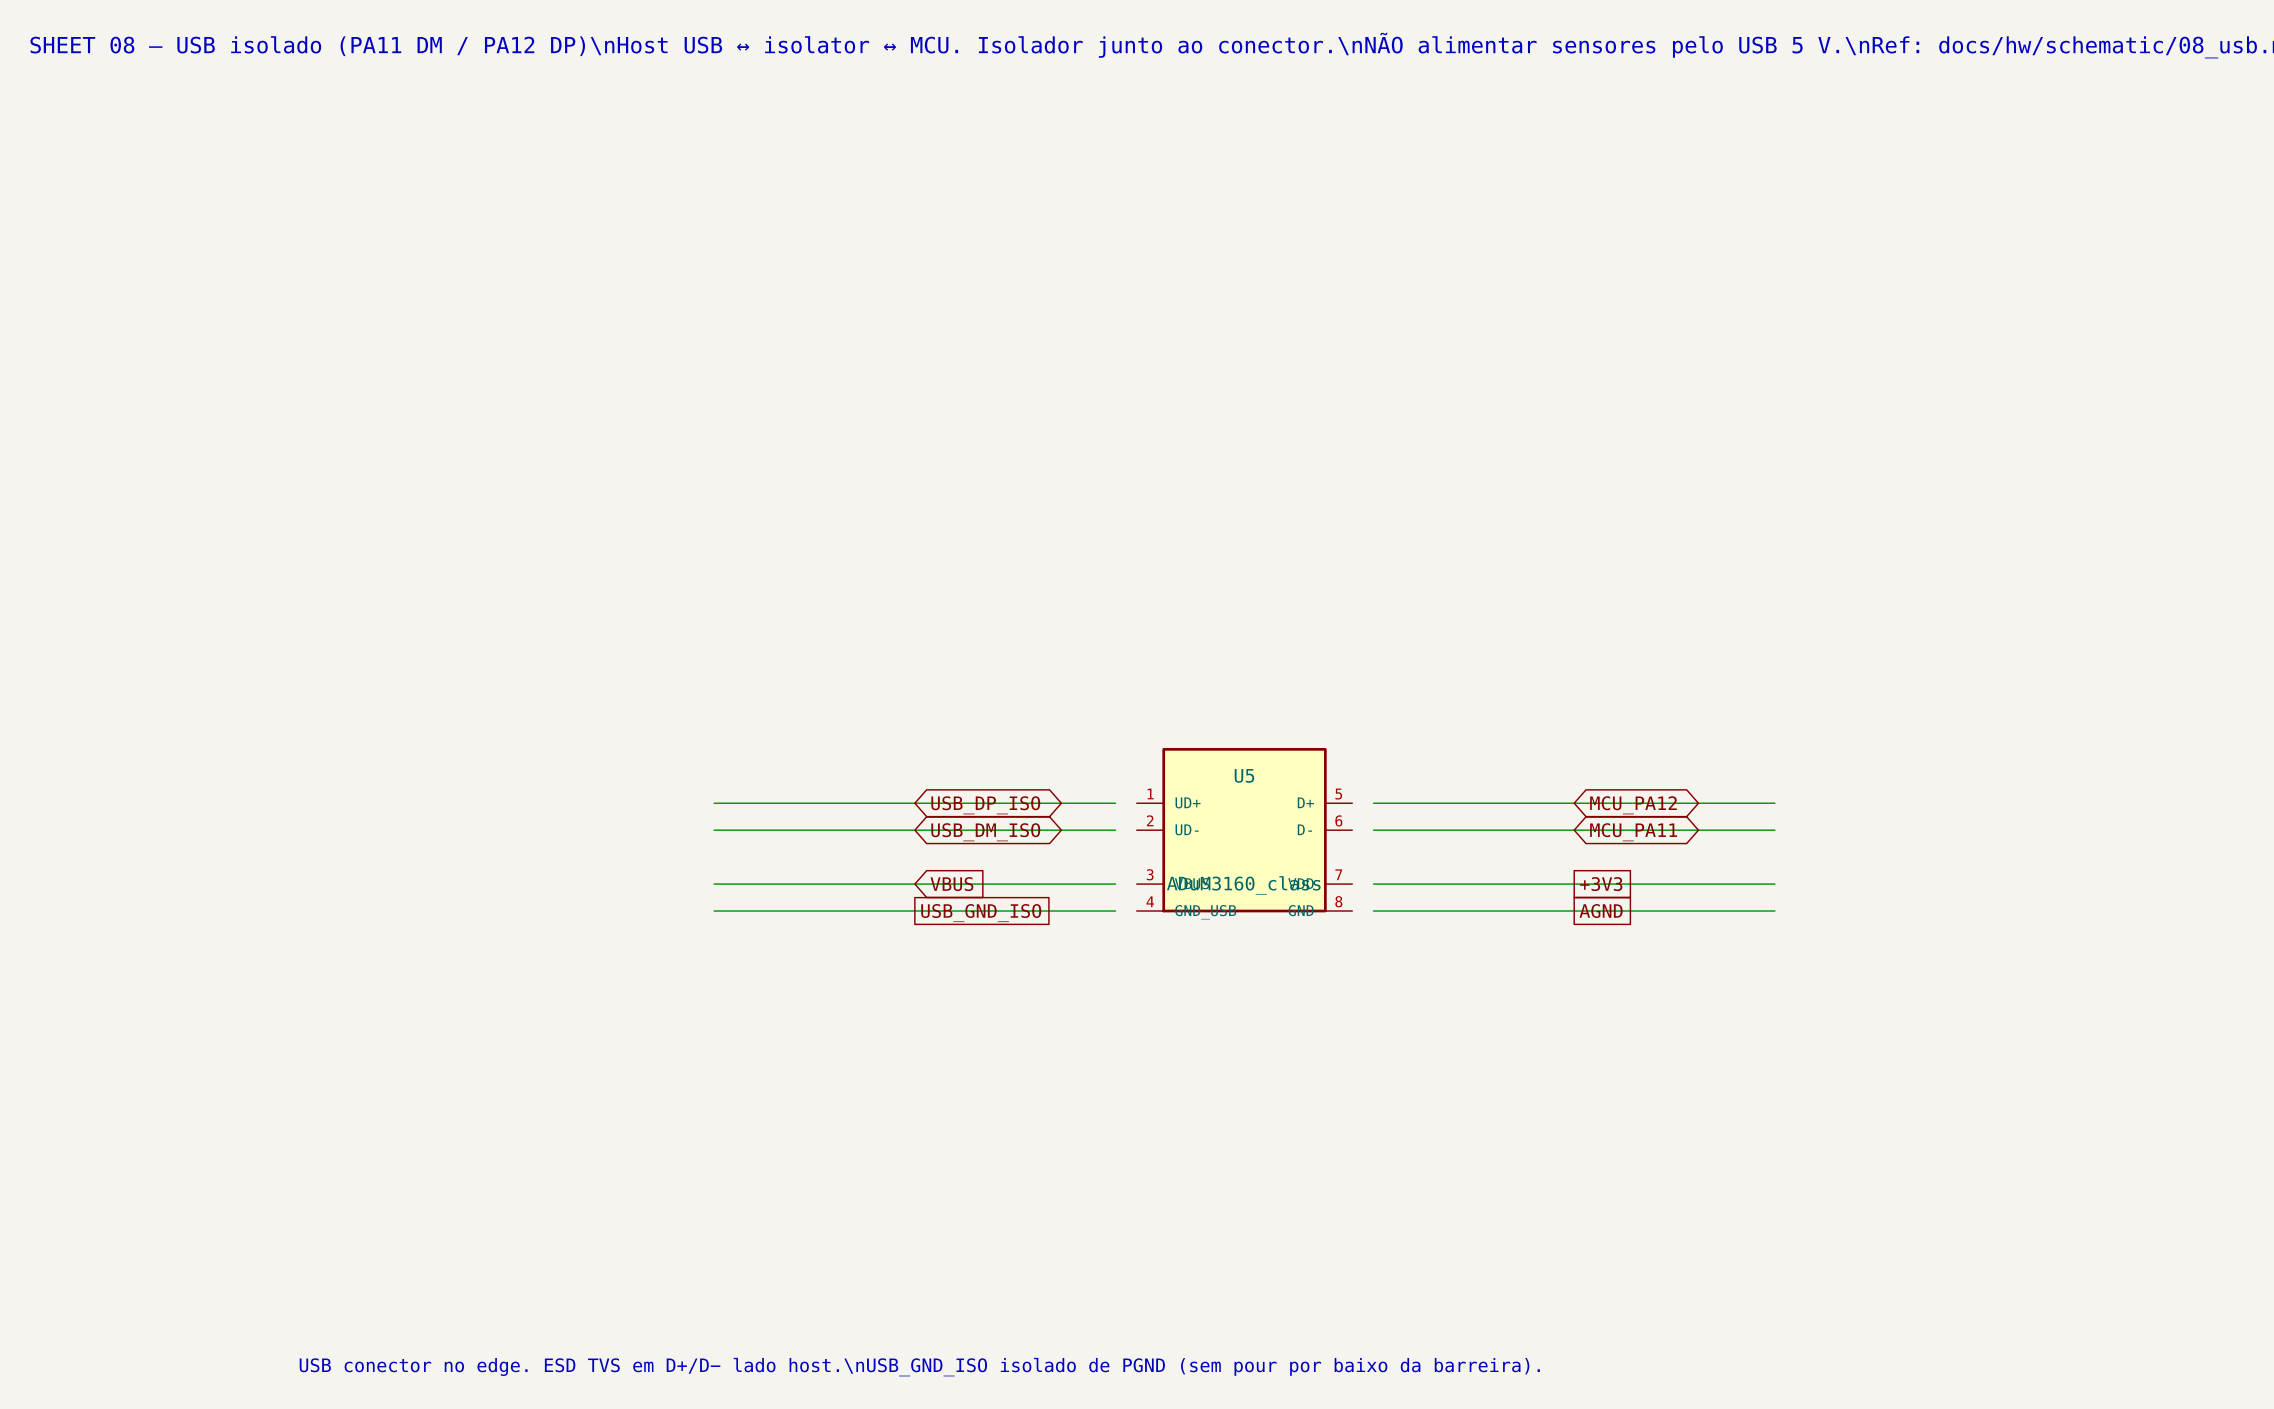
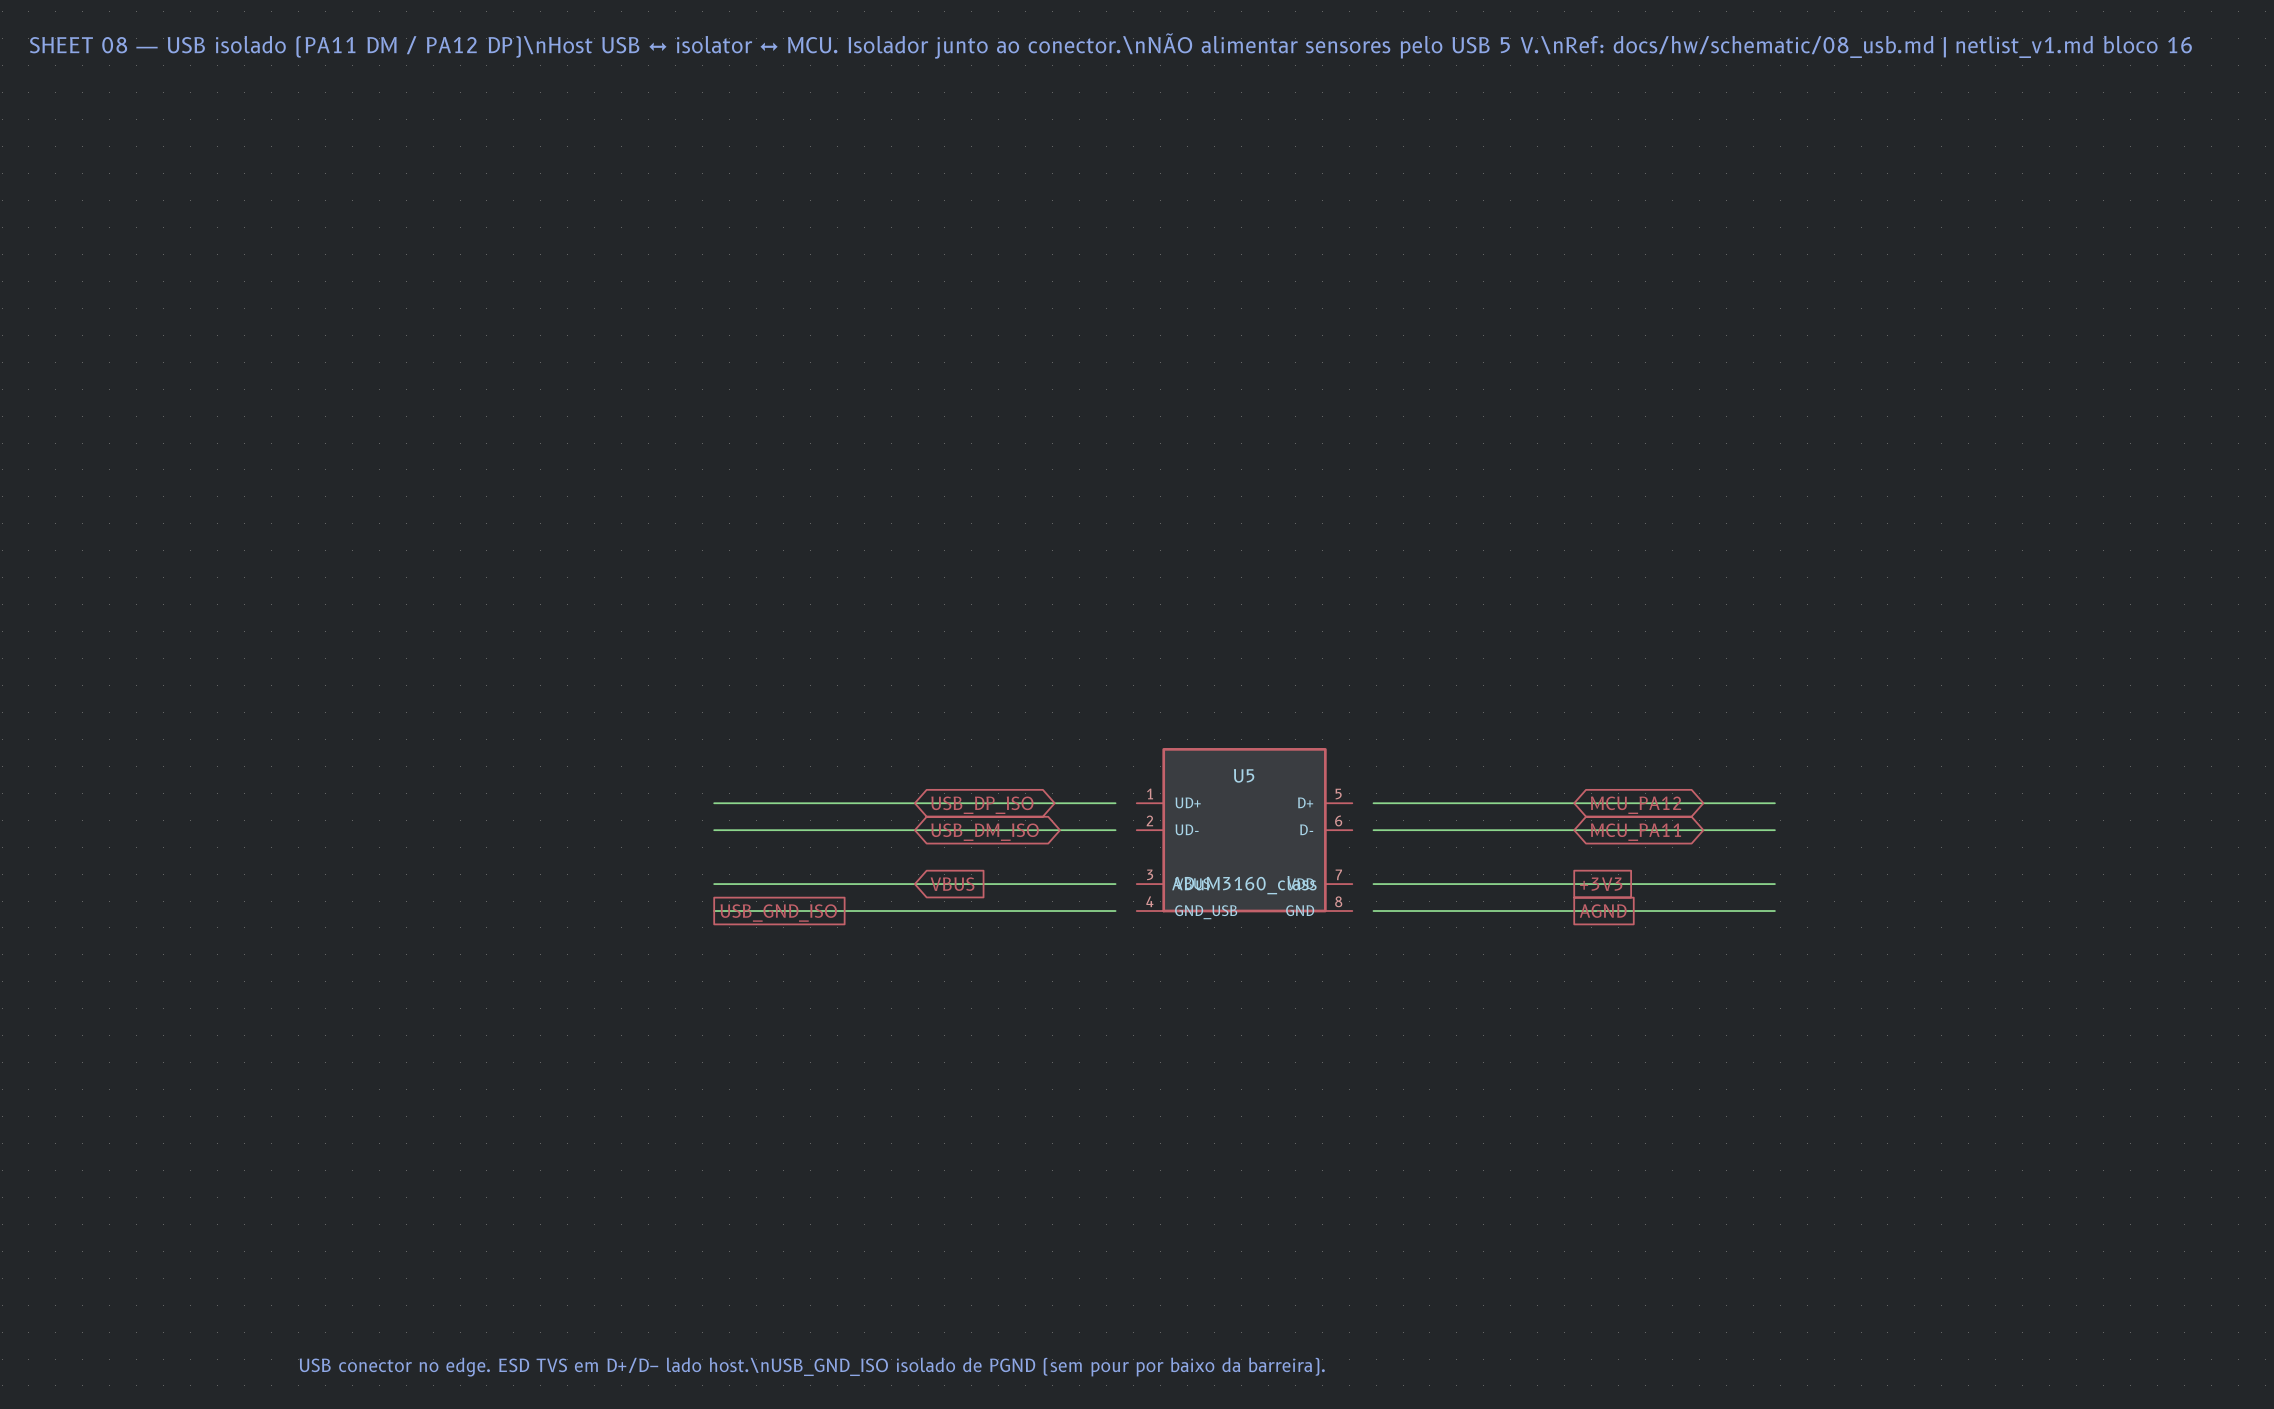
global label position: USB_GND_ISO (981, 913) -> USB_GND_ISO (778, 913)

